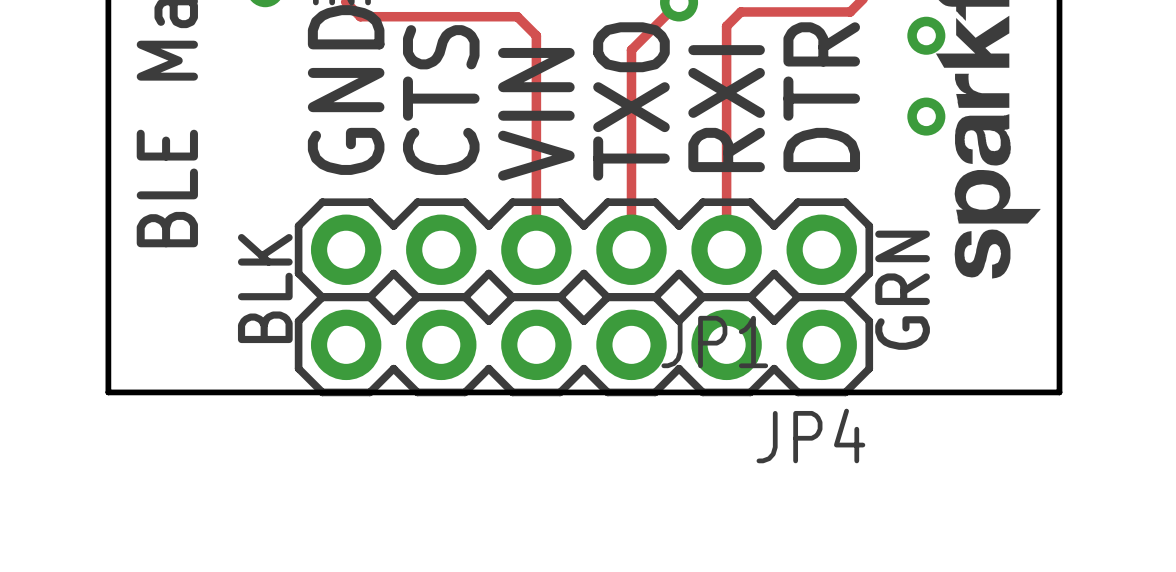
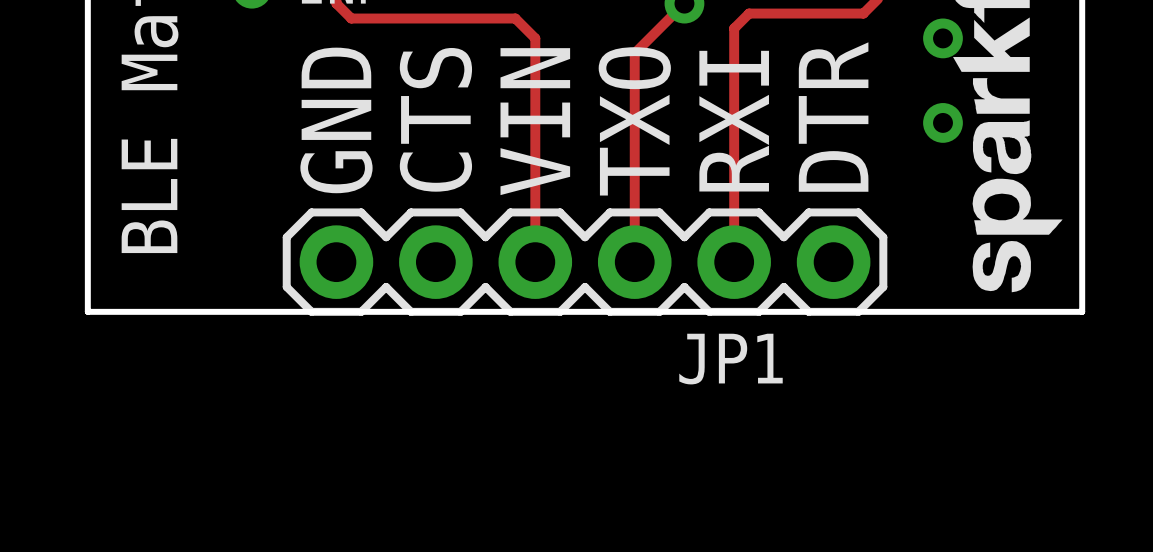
text: BLK (265, 288) -> none
text: GRN (902, 290) -> none
board edge: (108, 297) (108, 392) (1059, 392) (1059, 297) -> (87, 311) (1082, 311)
JP4: (583, 344) -> none

